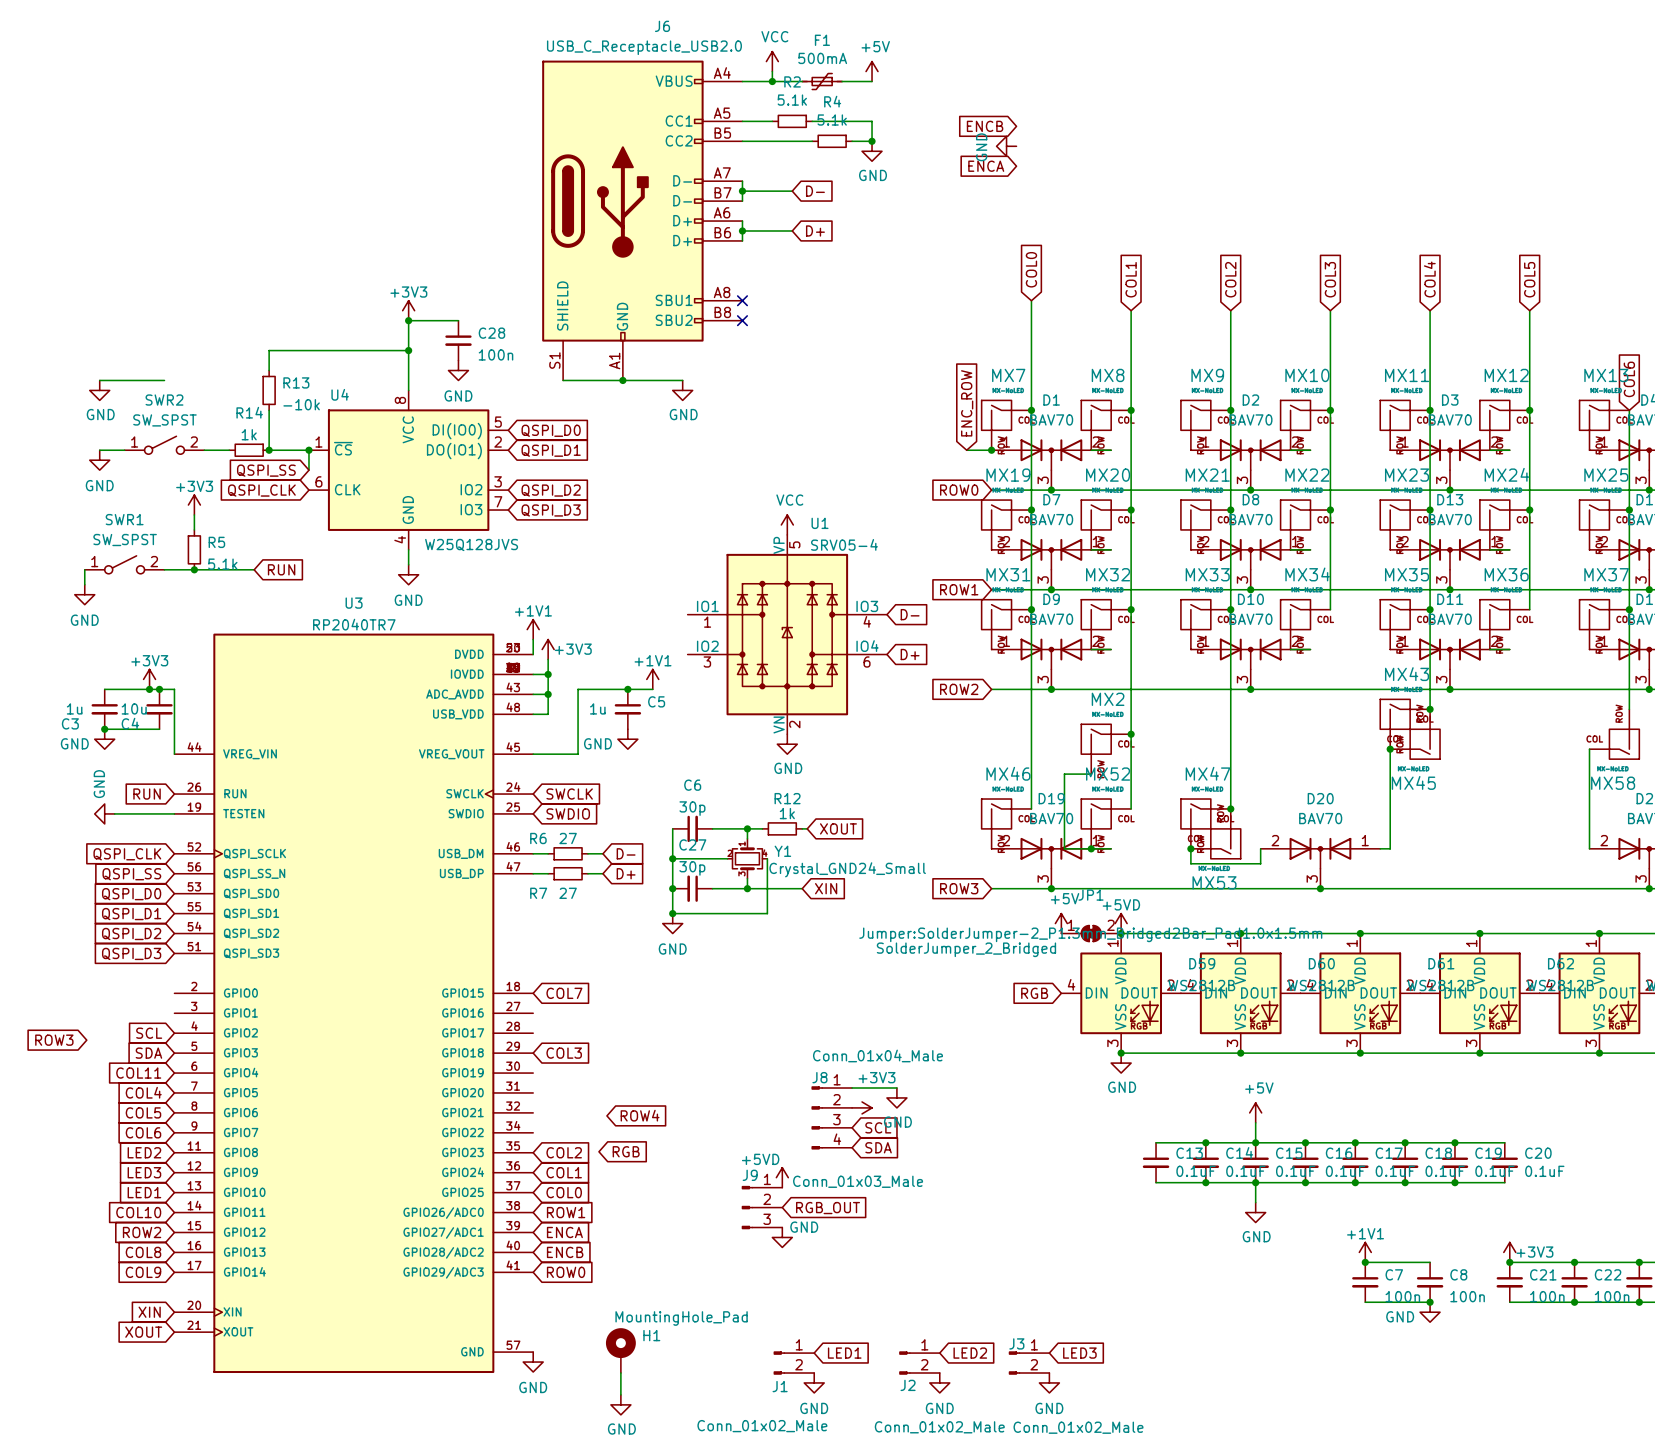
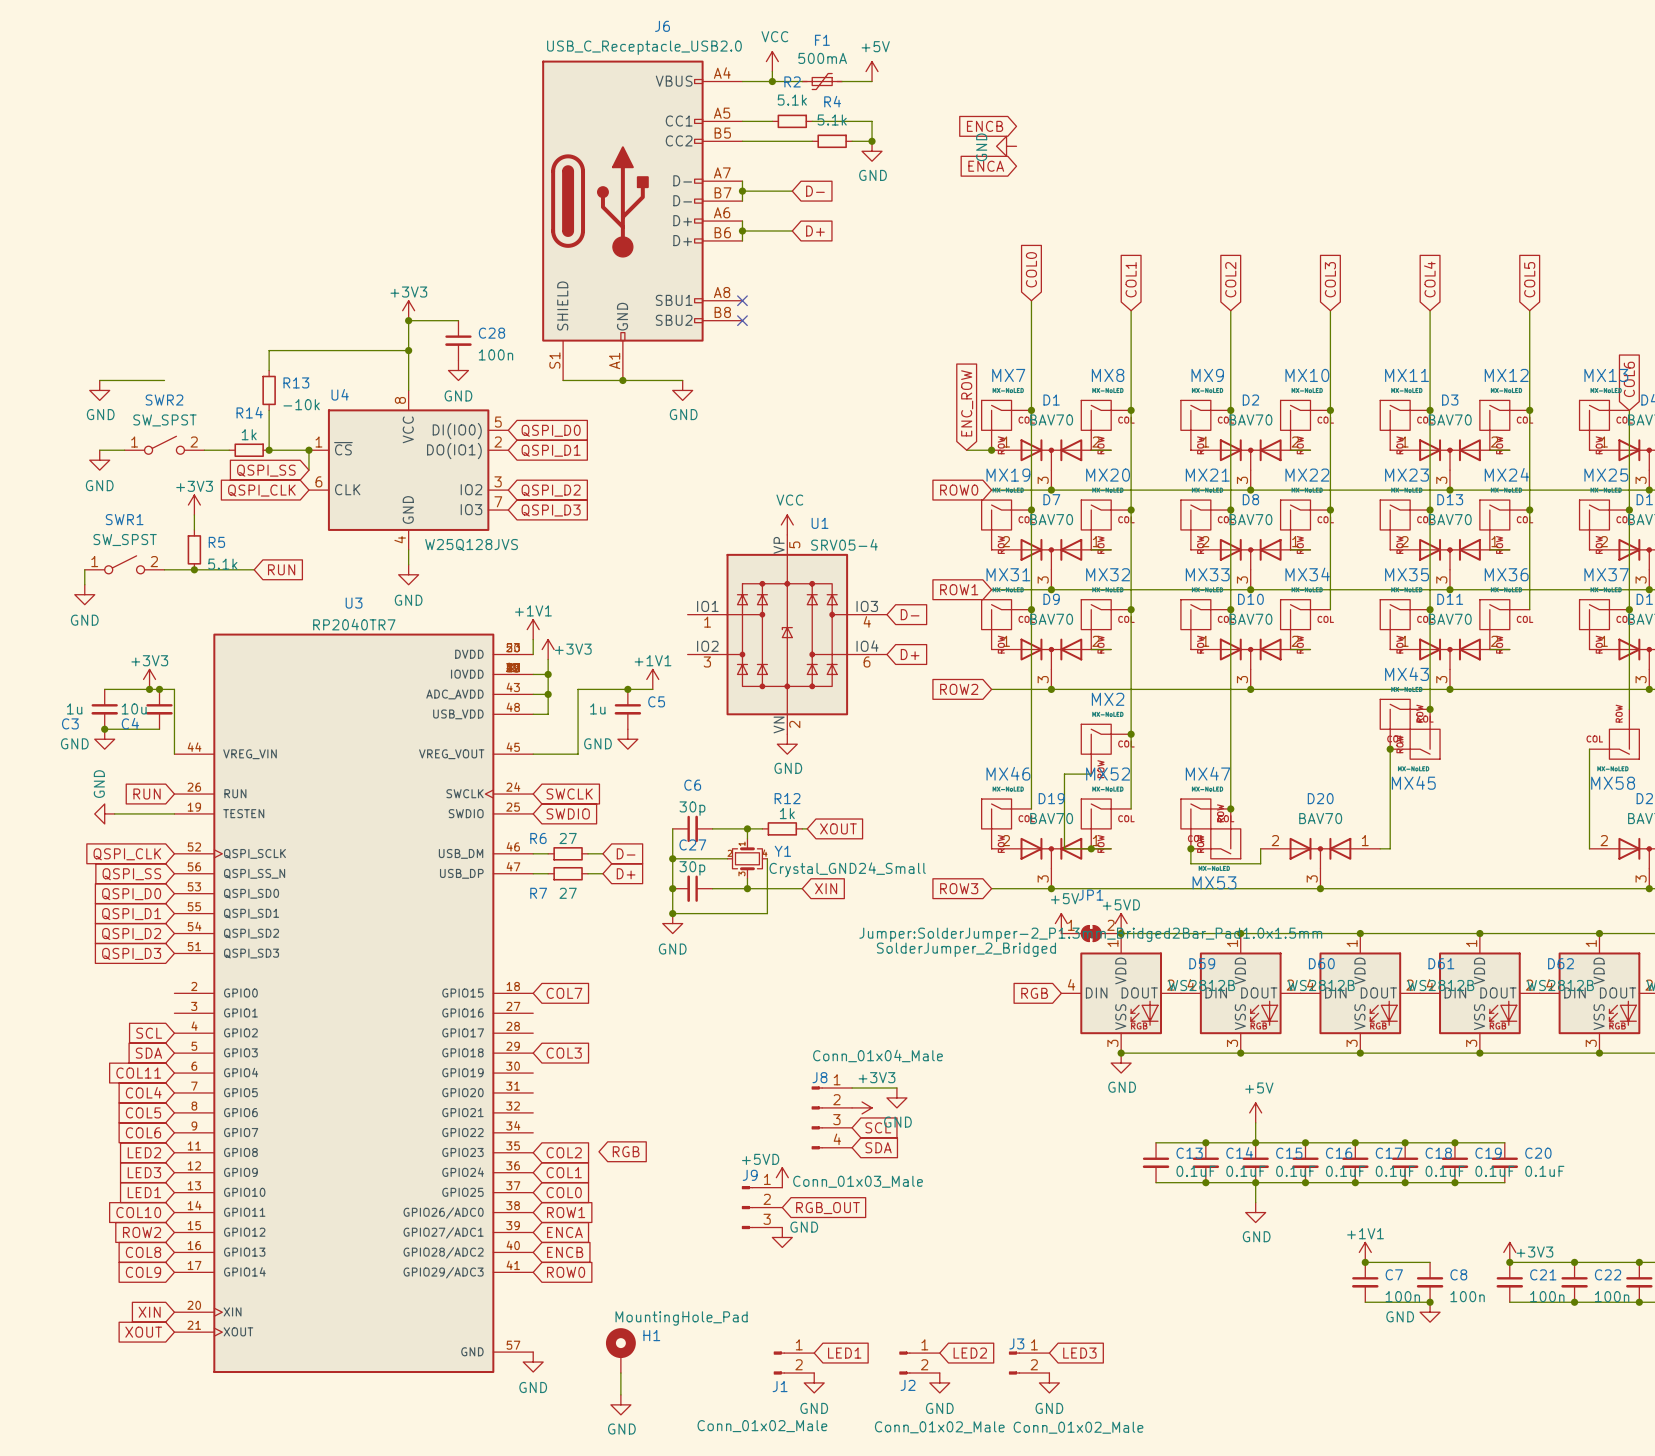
global label: ROW3 (54, 1040) -> none
global label: ROW4 (640, 1115) -> none

